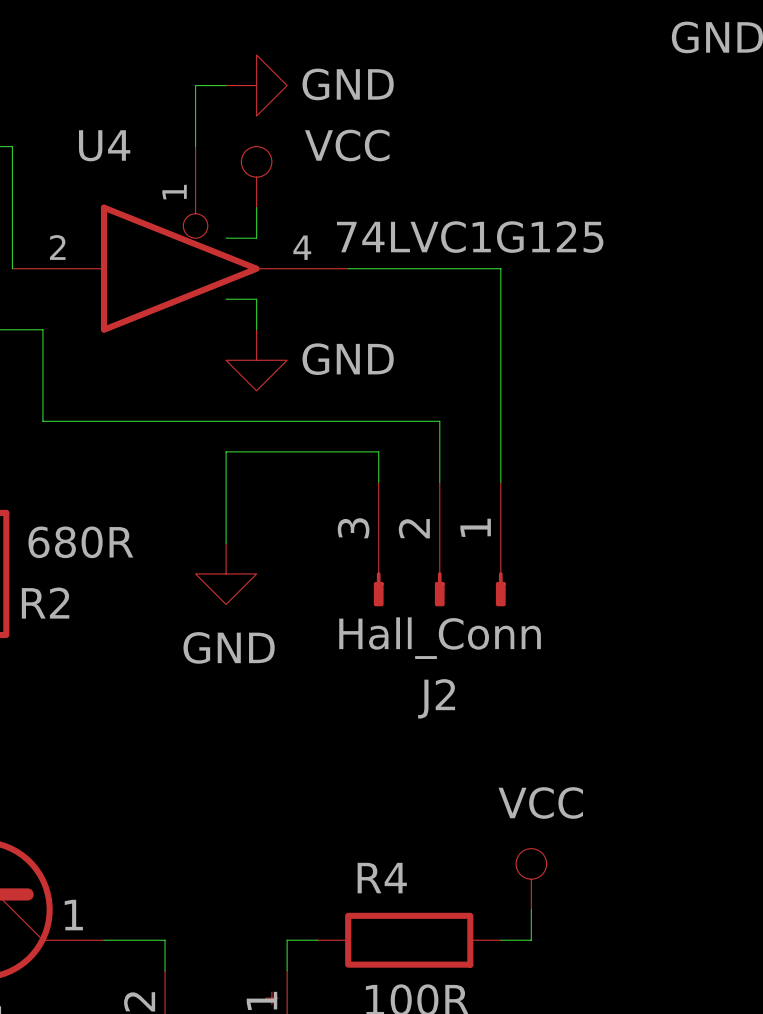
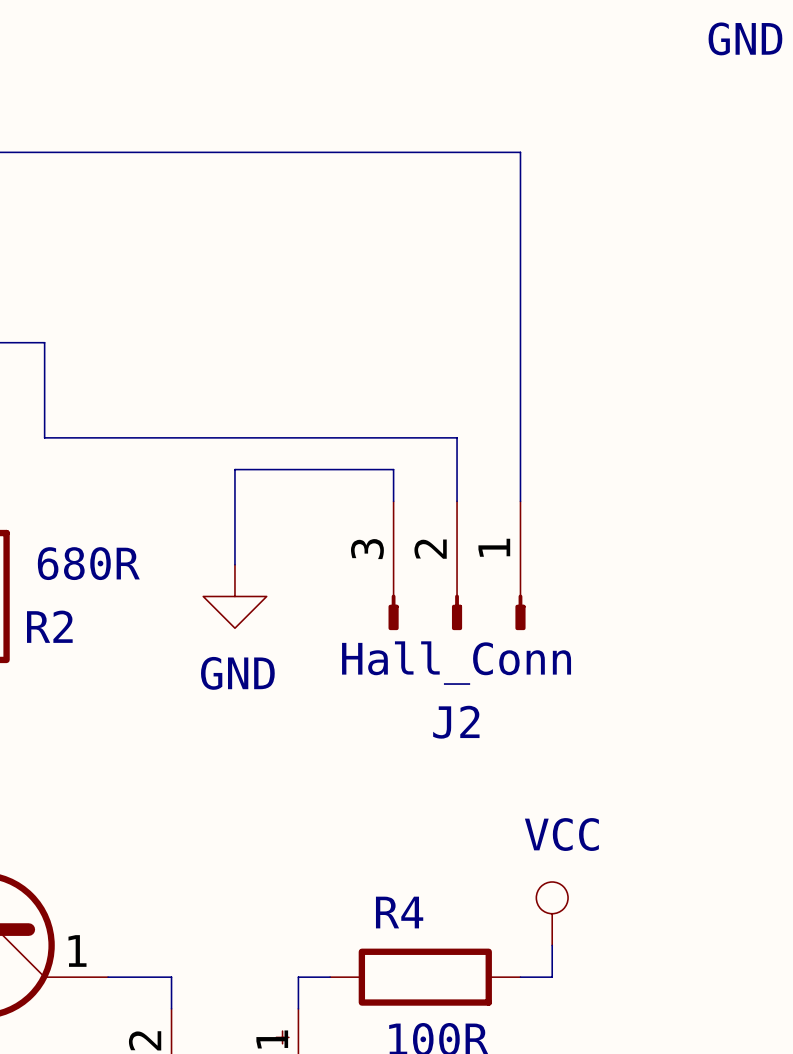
wire: (226, 85) (195, 85) (195, 146) -> none
power symbol: GND (256, 85) -> none
wire: (12, 146) (12, 268) -> none
power symbol: VCC (256, 177) -> none
wire: (256, 207) (256, 238) (226, 238) -> none
U4: 74LVC1G125 (180, 239) -> none
wire: (348, 268) (500, 268) -> (12, 152) (520, 152) (520, 279)
wire: (226, 299) (256, 299) (256, 329) -> none
power symbol: GND (256, 360) -> none

